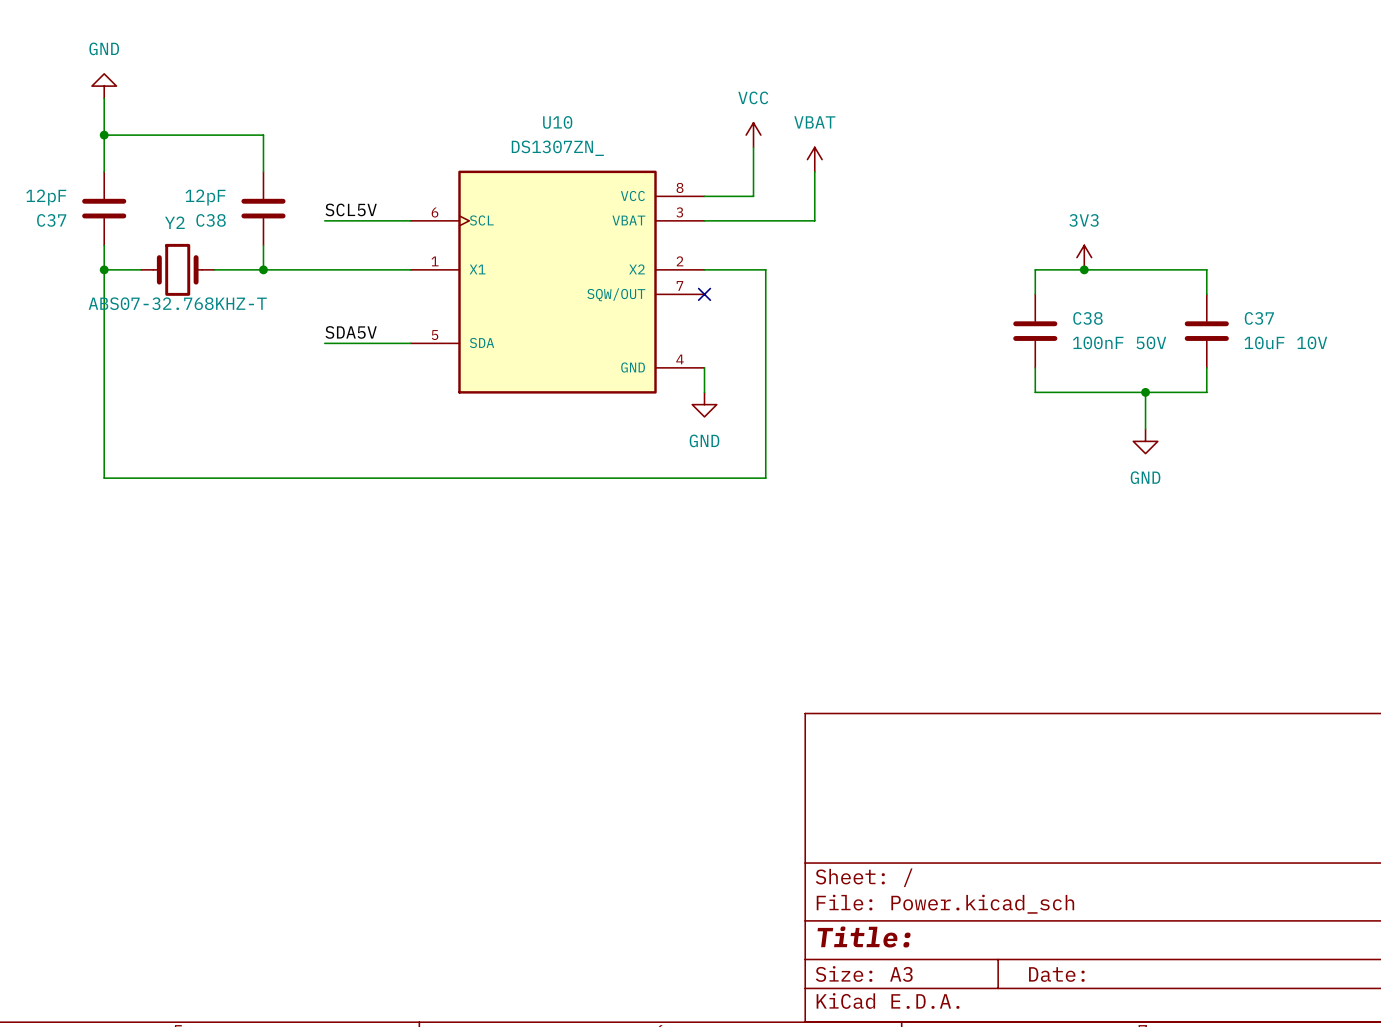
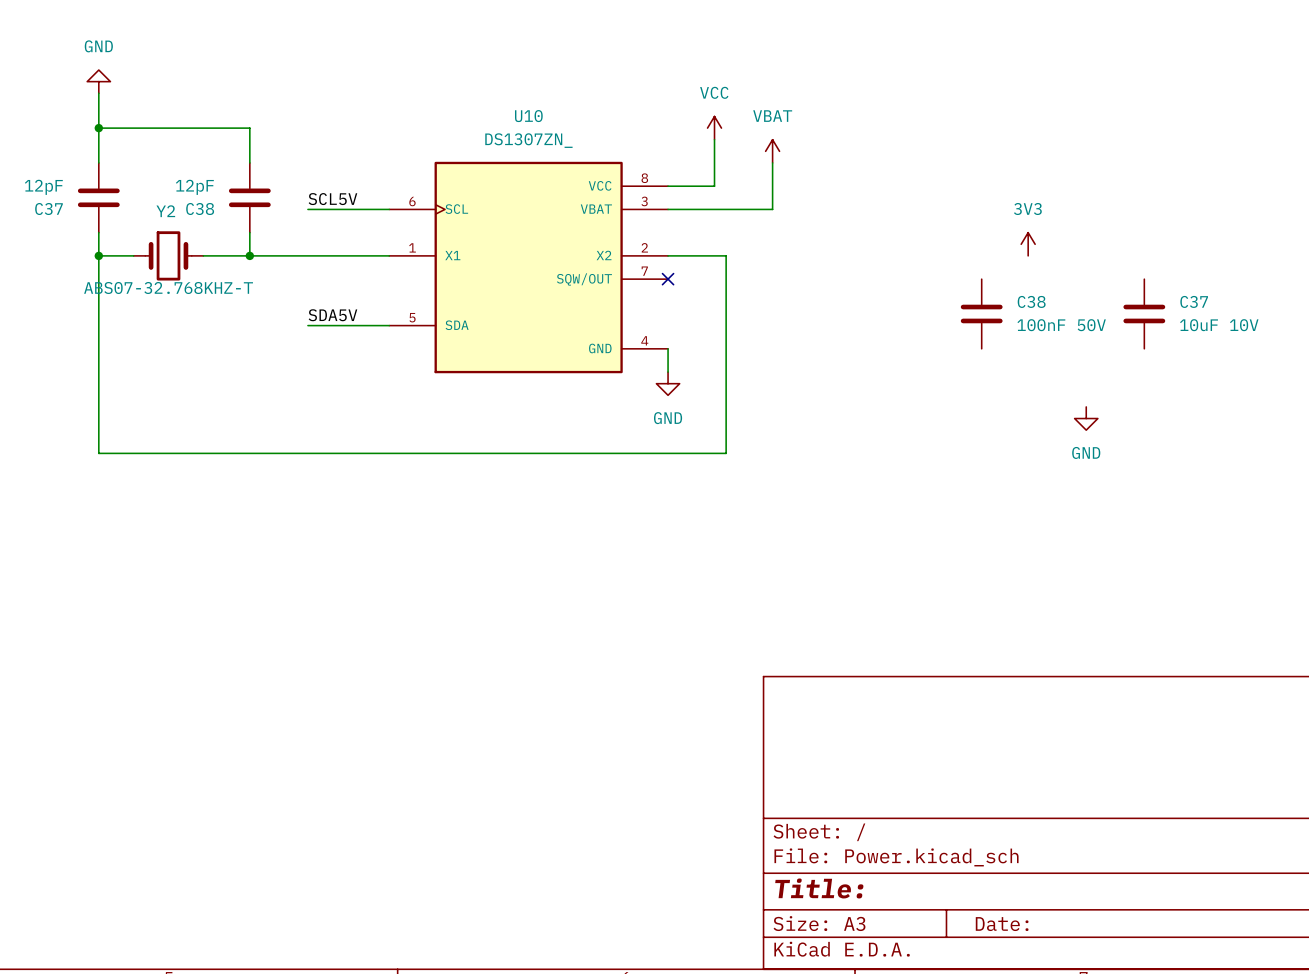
junction: (1084, 269) -> none
wire: (1035, 294) (1035, 269) (1206, 269) (1206, 294) -> none
wire: (1035, 367) (1035, 392) (1206, 392) (1206, 367) -> none
wire: (1145, 392) (1145, 429) -> none
junction: (1145, 392) -> none

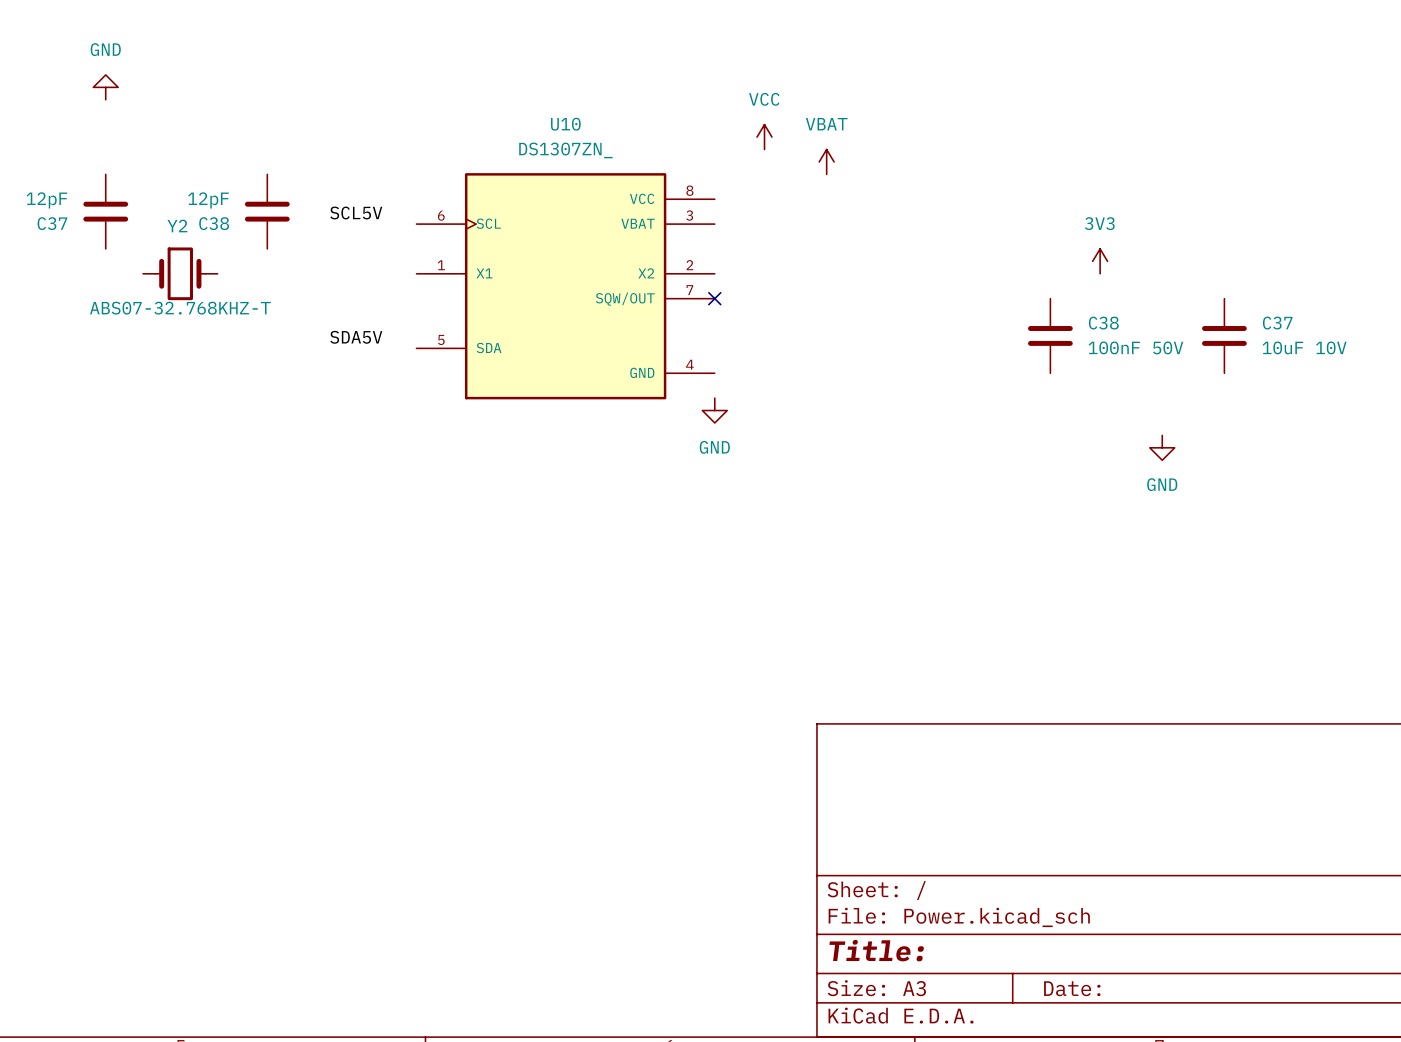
wire: (98, 93) (98, 162) -> none
wire: (98, 128) (249, 128) (249, 162) -> none
junction: (98, 128) -> none
wire: (714, 139) (714, 186) (668, 186) -> none
wire: (772, 162) (772, 209) (668, 209) -> none
wire: (307, 209) (389, 209) -> none
wire: (98, 232) (98, 453) (726, 453) (726, 255) (668, 255) -> none
wire: (249, 232) (249, 255) -> none
wire: (98, 255) (133, 255) -> none
junction: (98, 255) -> none
wire: (203, 255) (389, 255) -> none
junction: (249, 255) -> none
wire: (307, 325) (389, 325) -> none
wire: (668, 348) (668, 372) -> none

